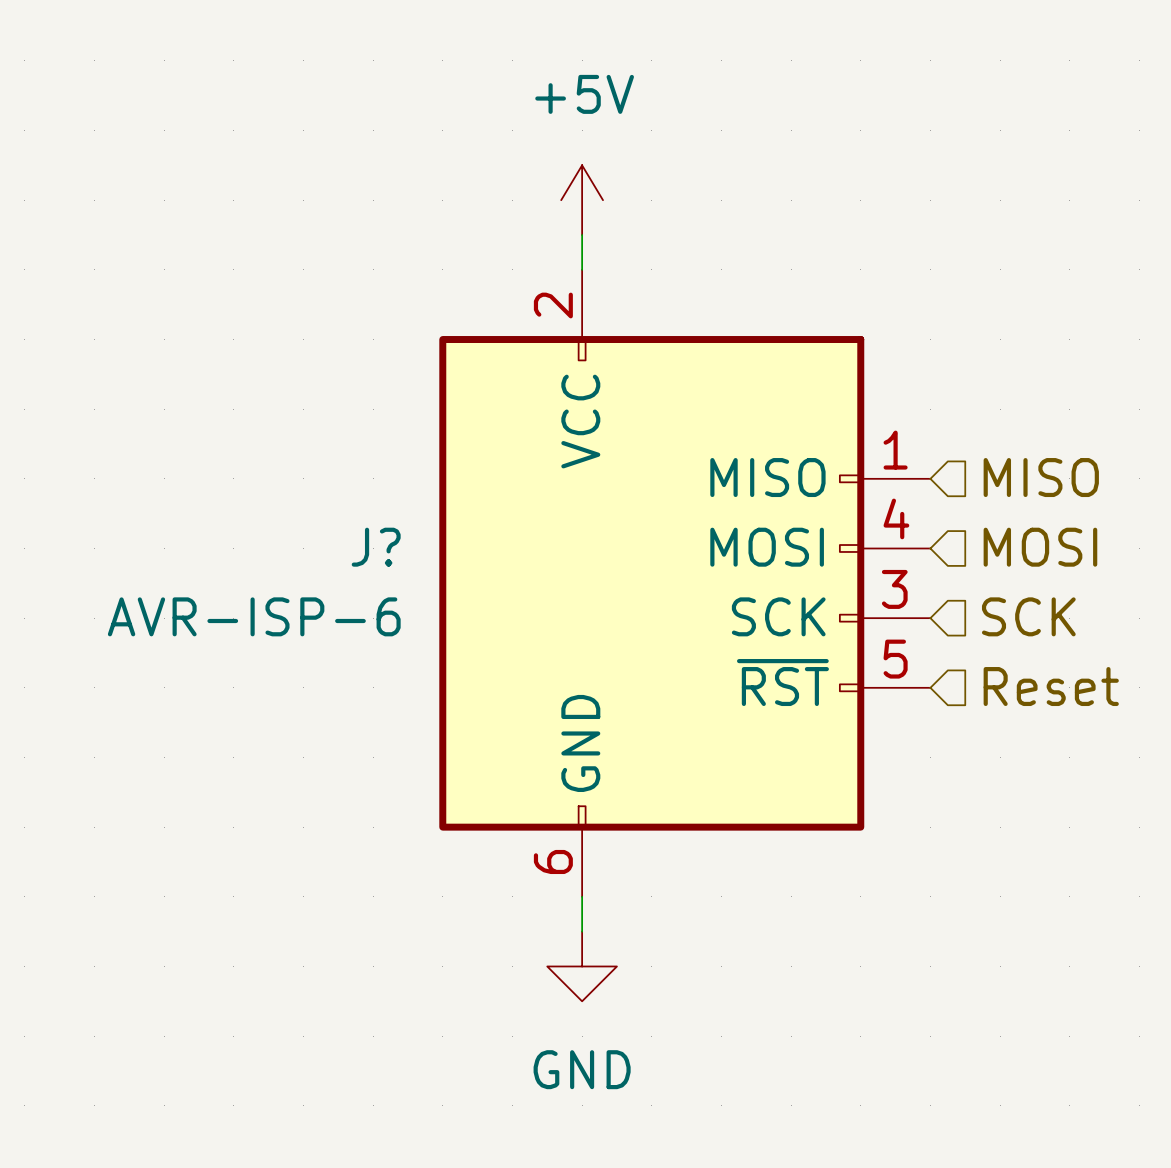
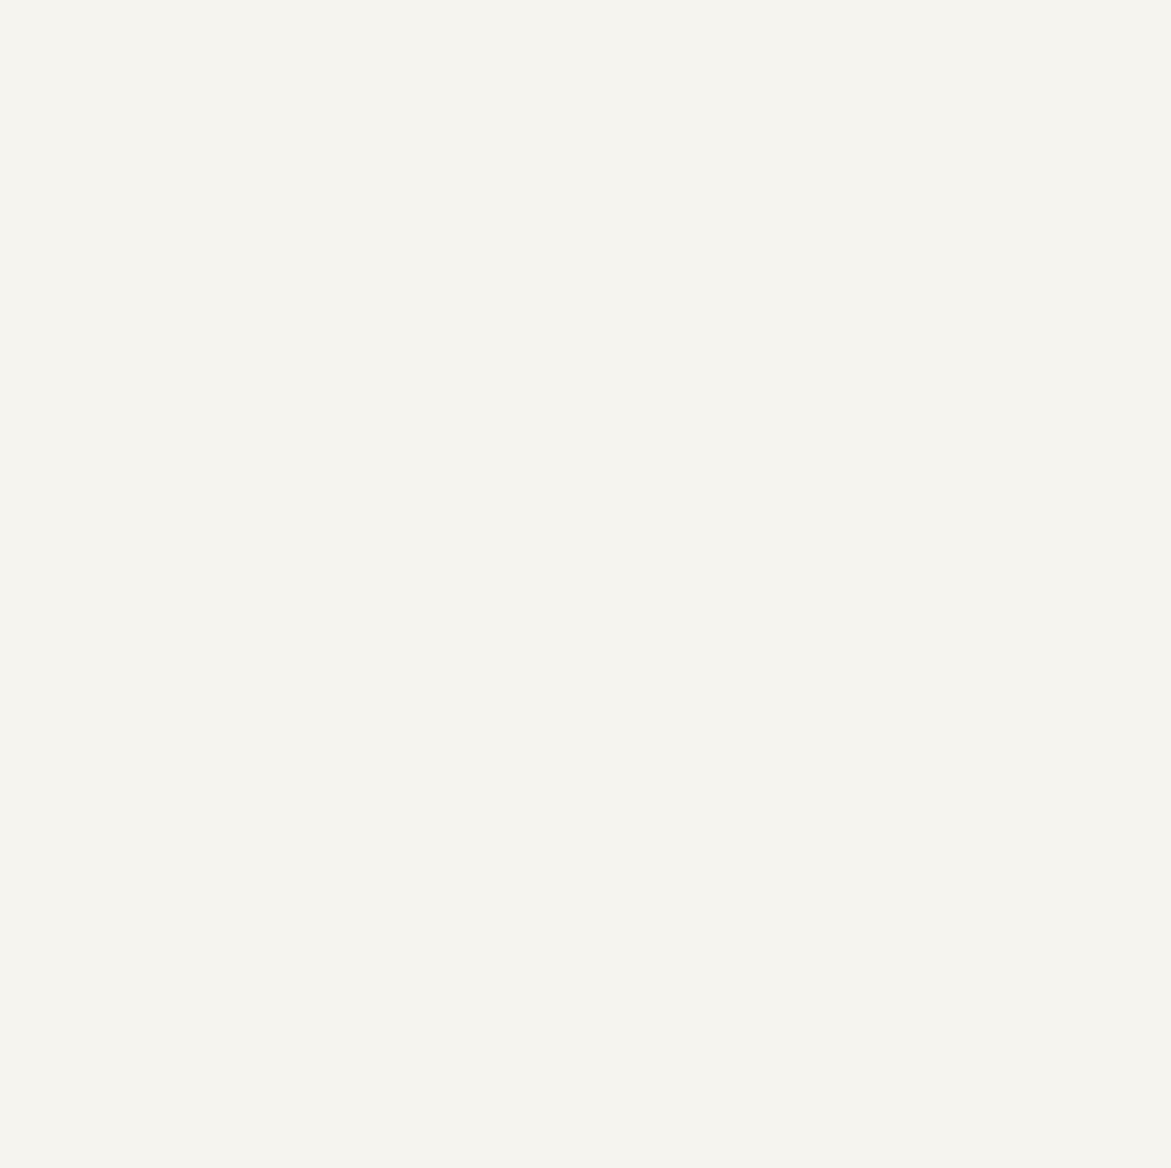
power symbol: +5V (582, 200) -> none
wire: (582, 235) (582, 269) -> none
hierarchical label: MISO (1041, 477) -> none
hierarchical label: MOSI (1040, 547) -> none
J?: AVR-ISP-6 (684, 583) -> none
hierarchical label: SCK (1028, 616) -> none
hierarchical label: Reset (1051, 686) -> none
wire: (582, 896) (582, 931) -> none
power symbol: GND (582, 966) -> none

